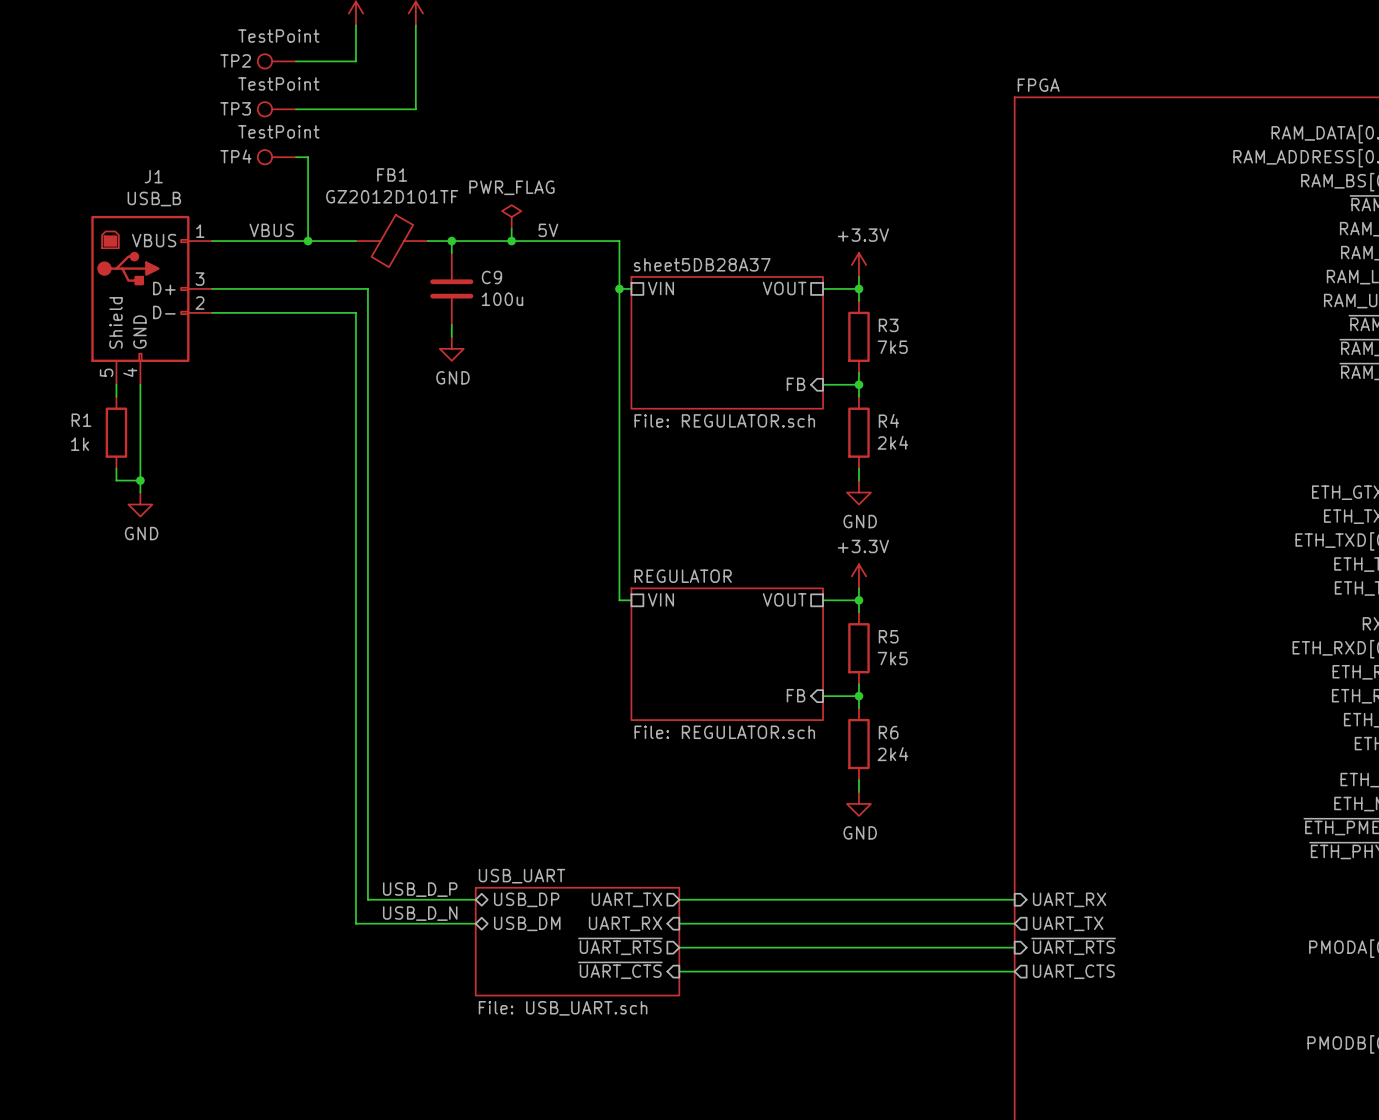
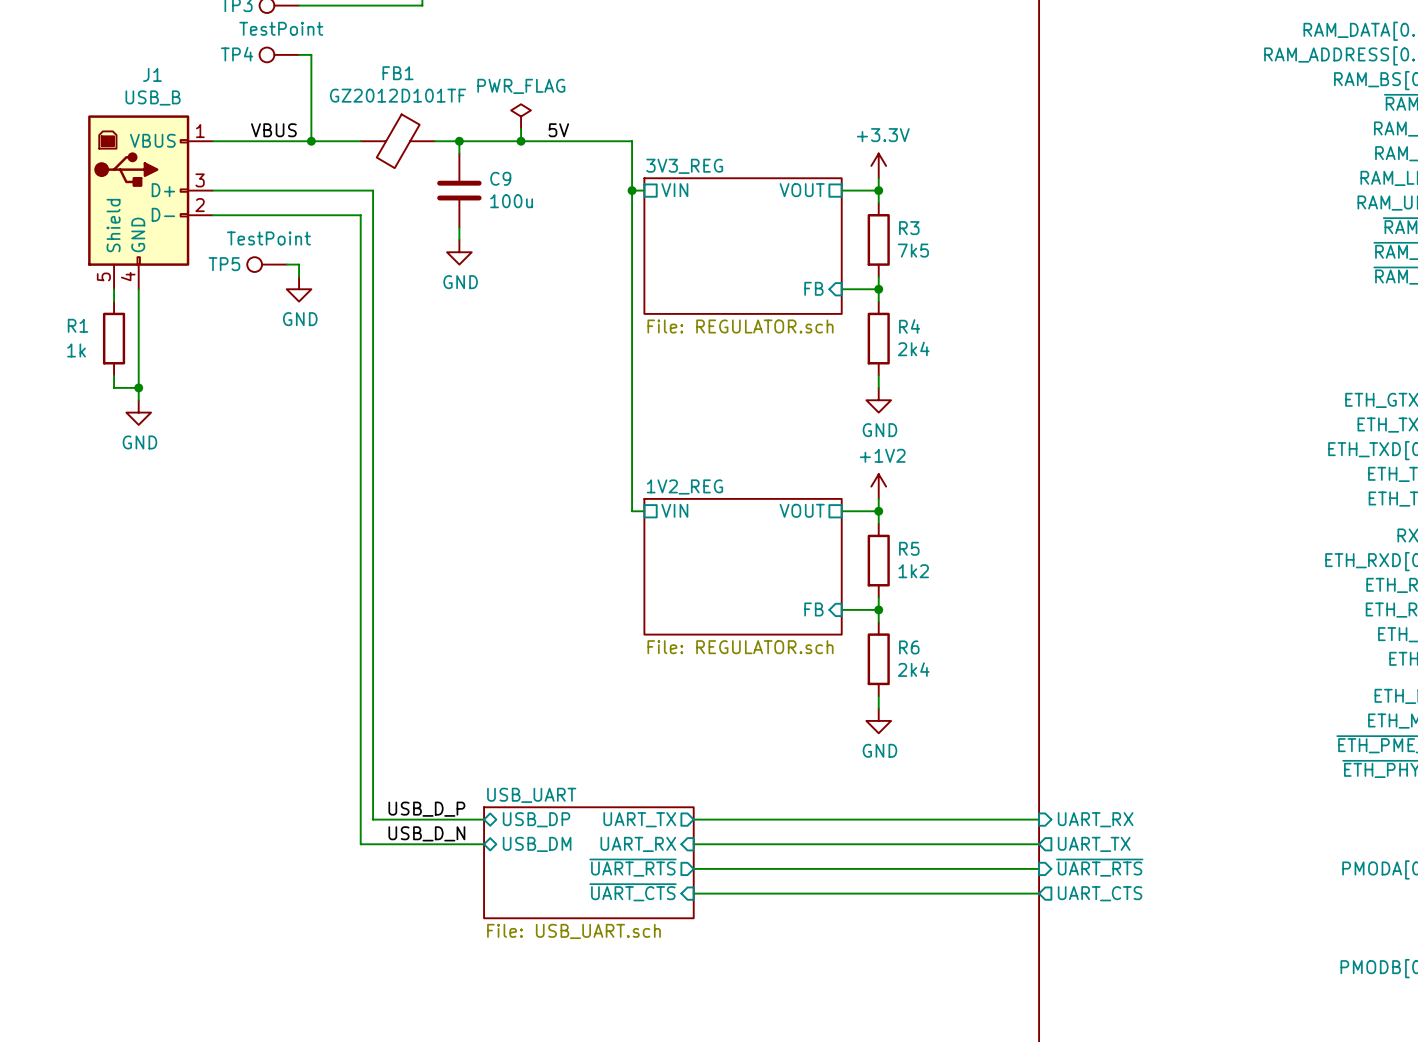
sheet sheet5DB28A37 name: sheet5DB28A37 (702, 264) -> 3V3_REG (684, 166)
TP5: none -> TestPoint (266, 264)
wire: none -> (286, 264) (299, 264) (299, 276)
power symbol: none -> GND (299, 289)
sheet REGULATOR name: REGULATOR (683, 576) -> 1V2_REG (685, 486)
power symbol: +3.3V (858, 576) -> +1V2 (878, 486)
R5 value: 7k5 (892, 658) -> 1k2 (913, 571)

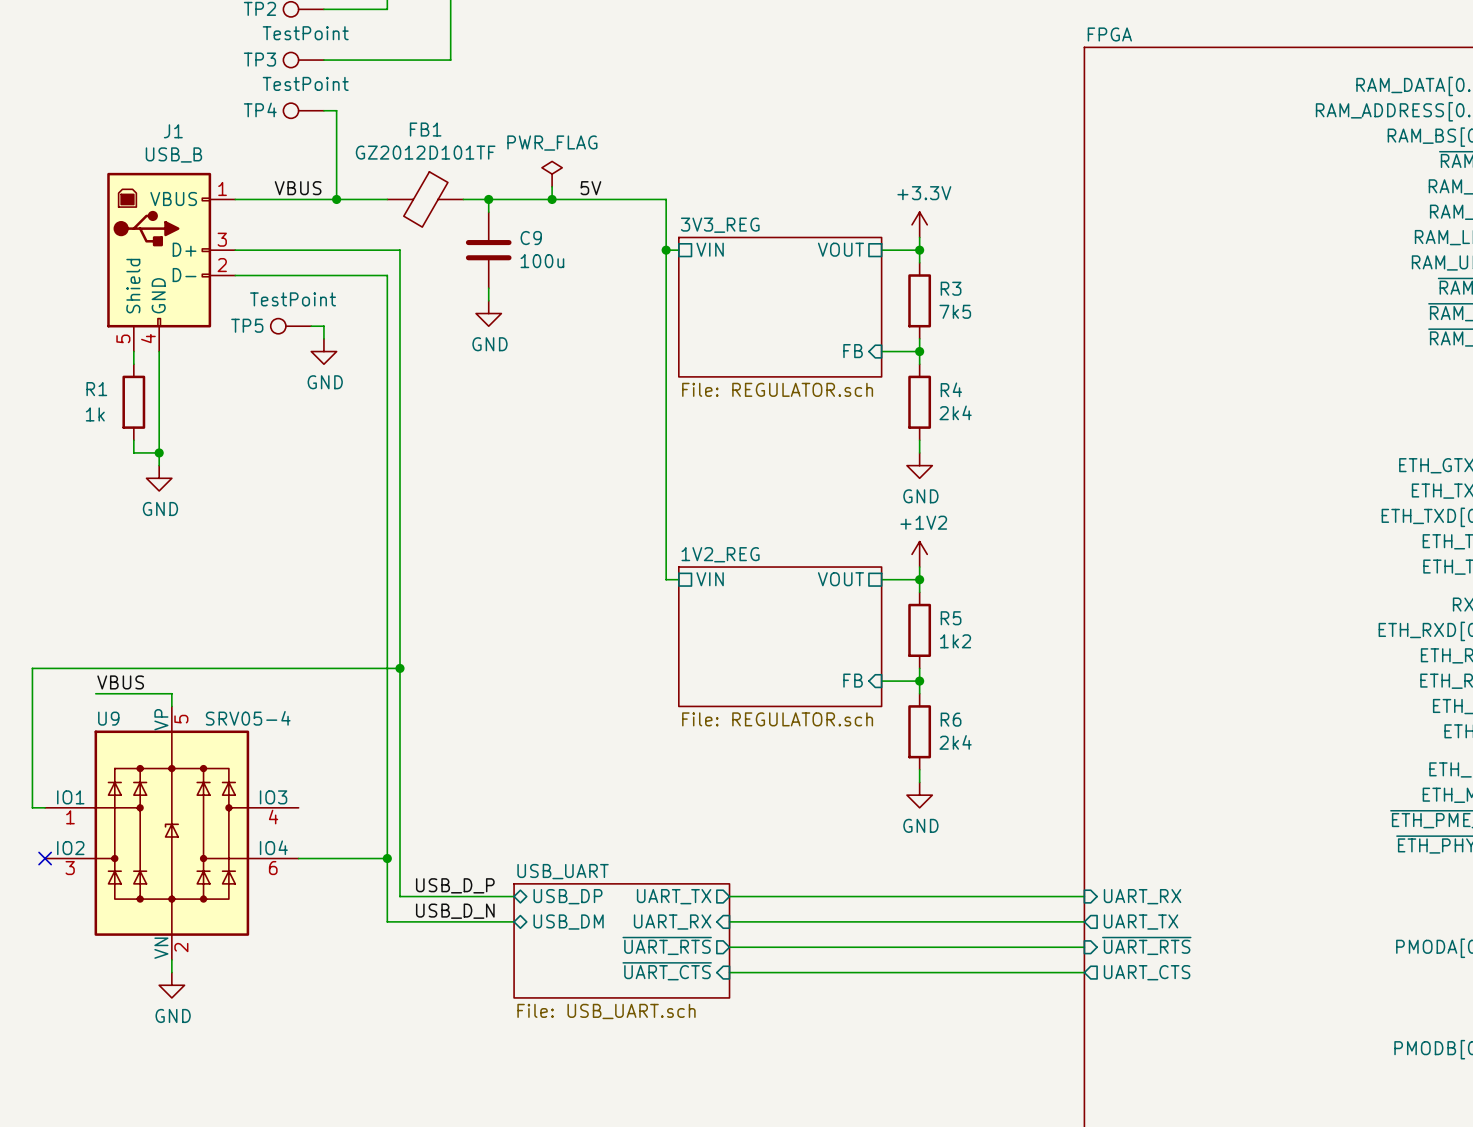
wire: none -> (399, 668) (32, 668) (32, 807) (45, 807)
junction: none -> (399, 668)
label: none -> VBUS (120, 682)
wire: none -> (95, 693) (171, 693) (171, 706)
U9: none -> SRV05-4 (171, 833)
no-connect mark: none -> (45, 858)
wire: none -> (298, 858) (387, 858)
junction: none -> (387, 858)
wire: none -> (171, 959) (171, 972)
power symbol: none -> GND (171, 985)

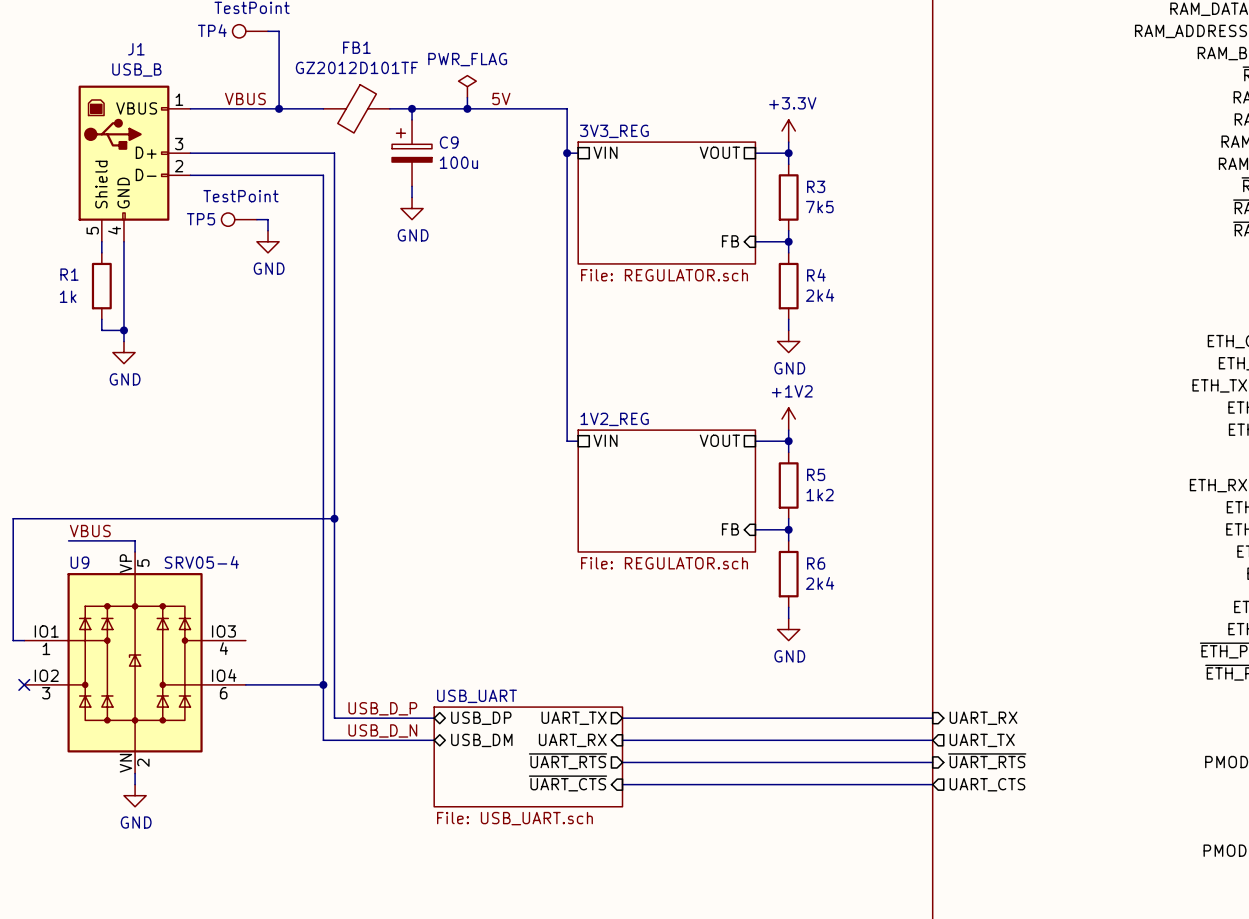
C9 symbol: [465, 212, 512, 289] -> [392, 119, 432, 187]

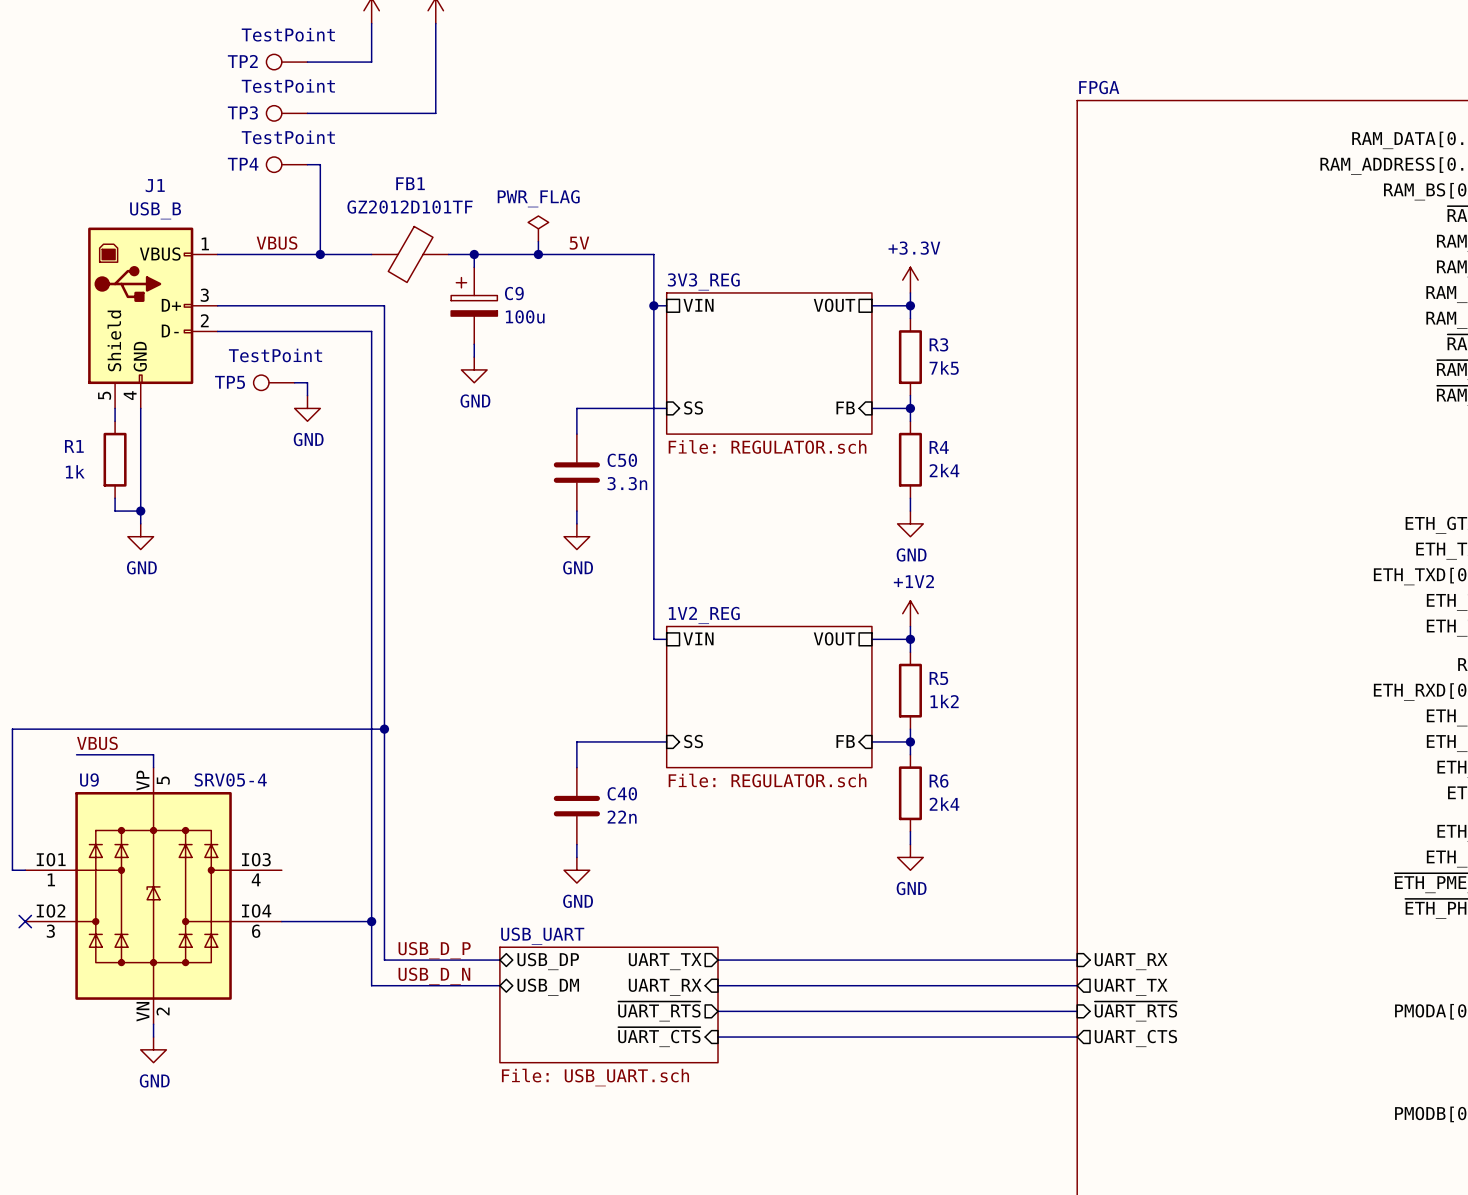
wire: none -> (666, 408) (576, 408) (576, 434)
sheet pin: none -> SS (693, 407)
C50: none -> 3.3n (576, 472)
wire: none -> (576, 511) (576, 523)
power symbol: none -> GND (576, 536)
wire: none -> (666, 741) (576, 741) (576, 767)
sheet pin: none -> SS (693, 741)
C40: none -> 22n (576, 806)
wire: none -> (576, 844) (576, 857)
power symbol: none -> GND (576, 870)

